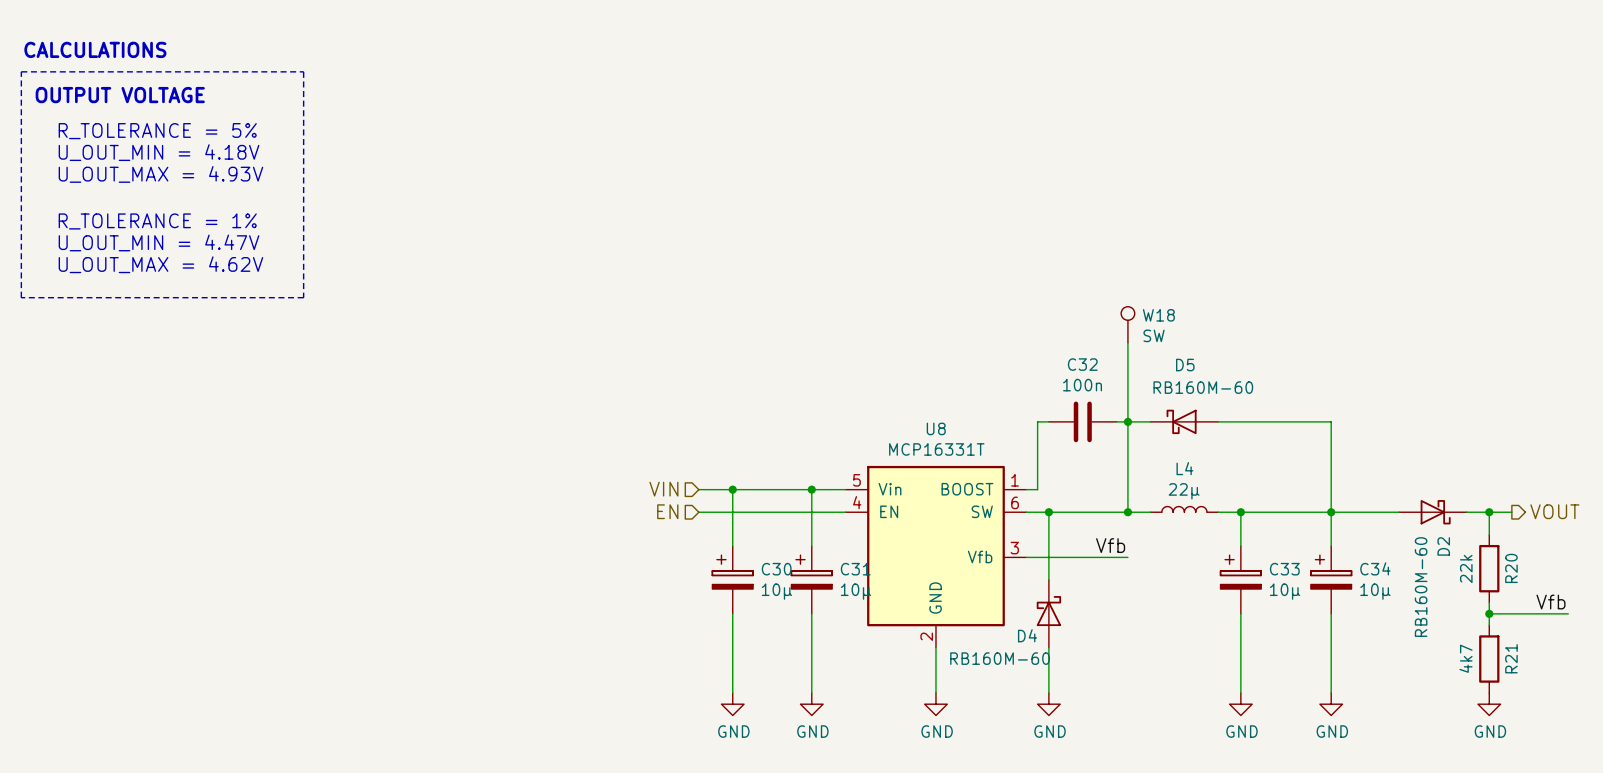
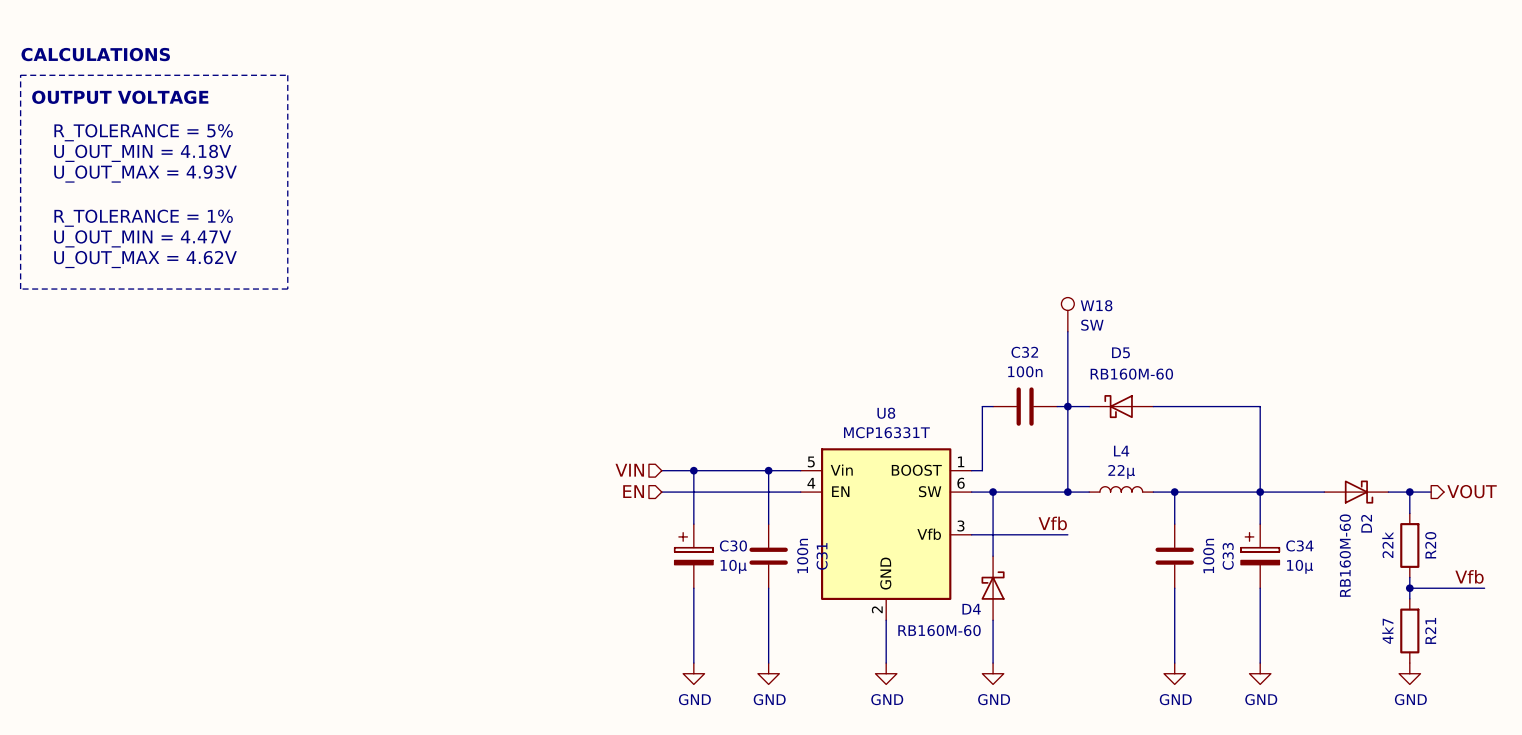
C31 symbol: [791, 546, 833, 614] -> [749, 524, 788, 589]
C33 symbol: [1220, 546, 1262, 614] -> [1155, 524, 1194, 589]
C31 value: 10µ (855, 591) -> 100n (802, 555)
C33 value: 10µ (1285, 591) -> 100n (1208, 555)

